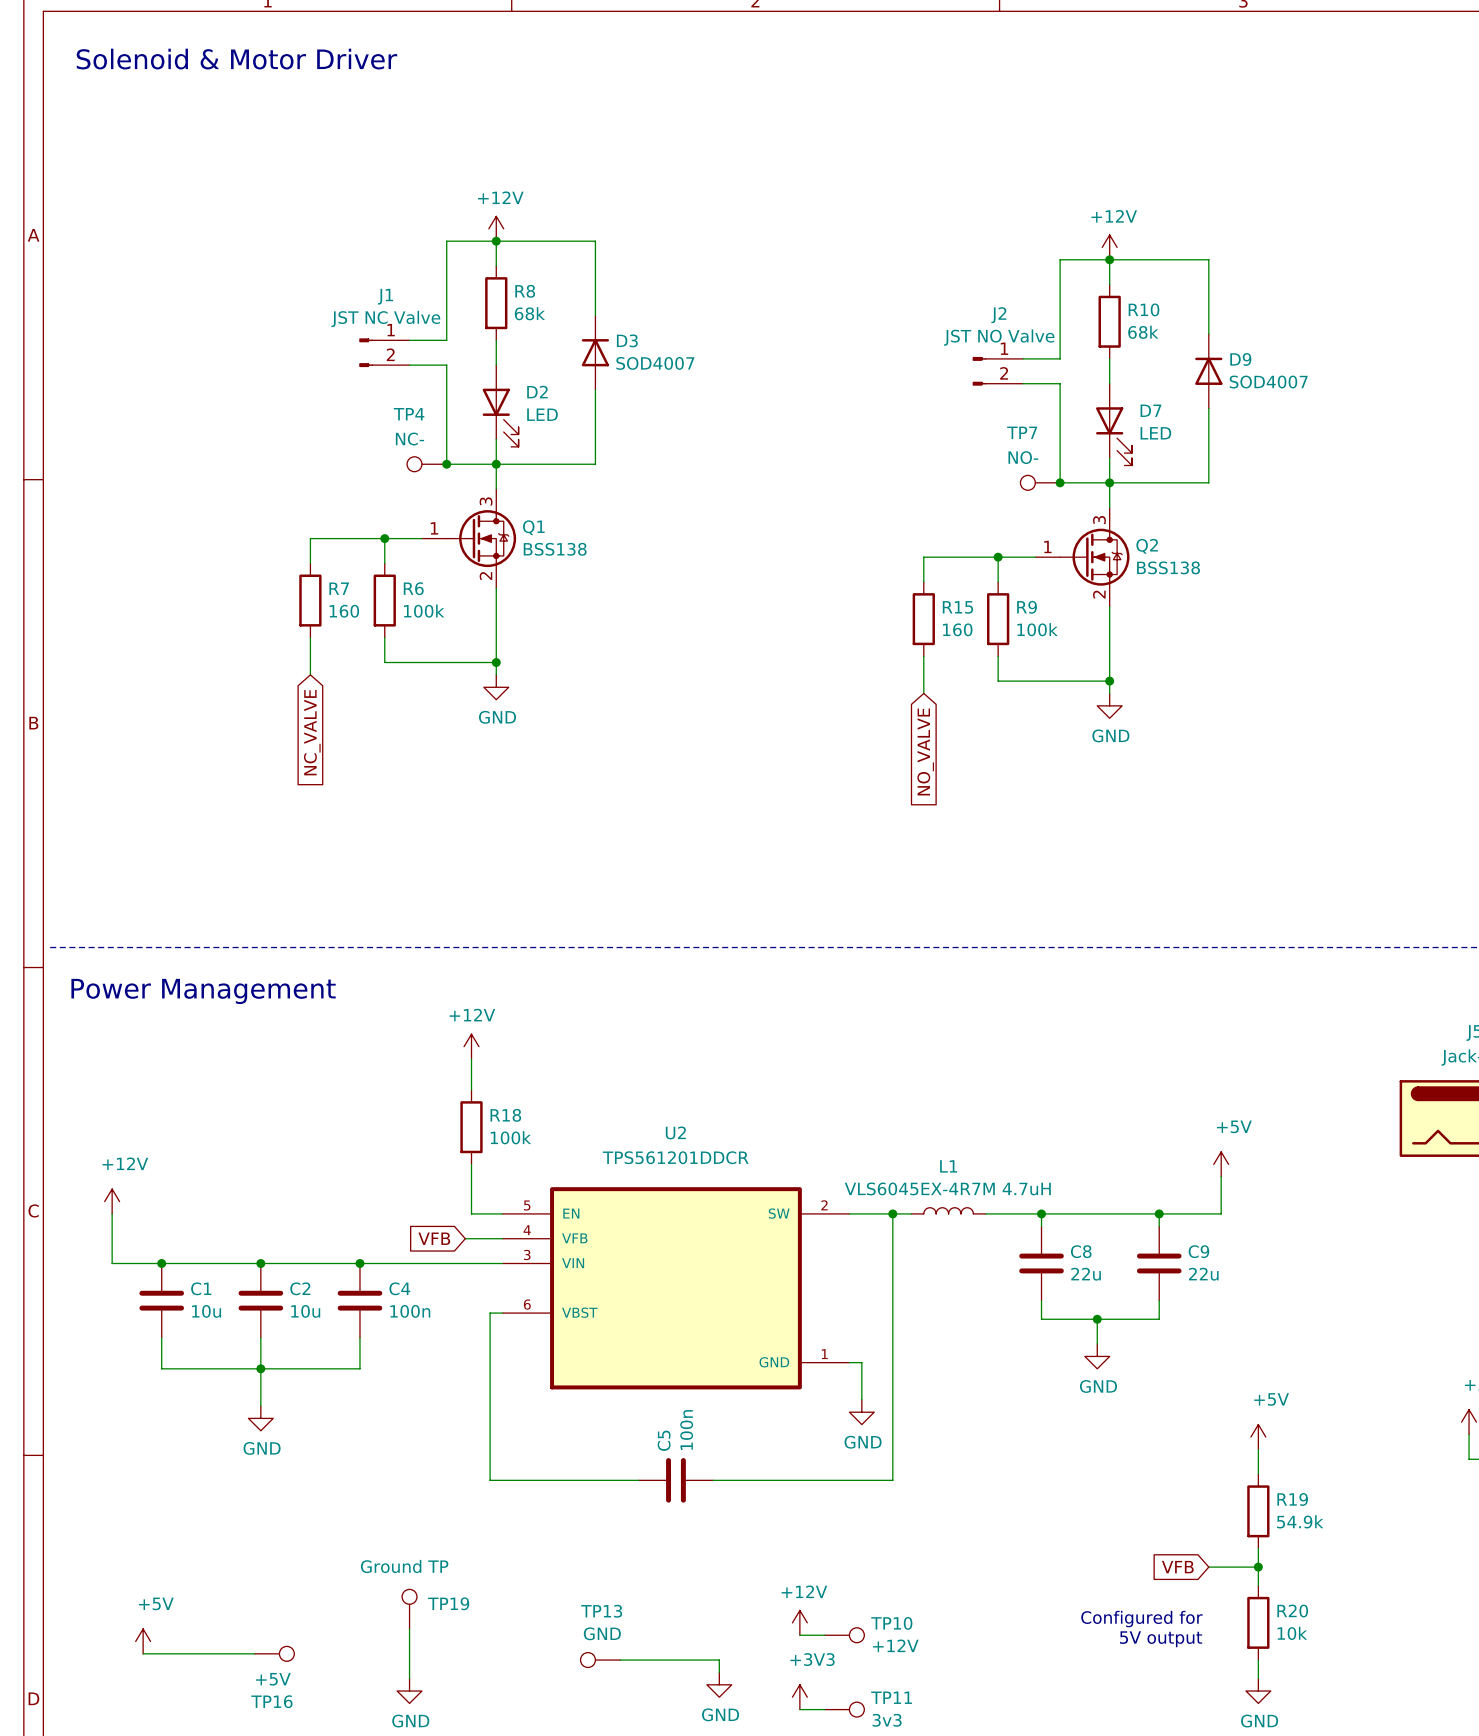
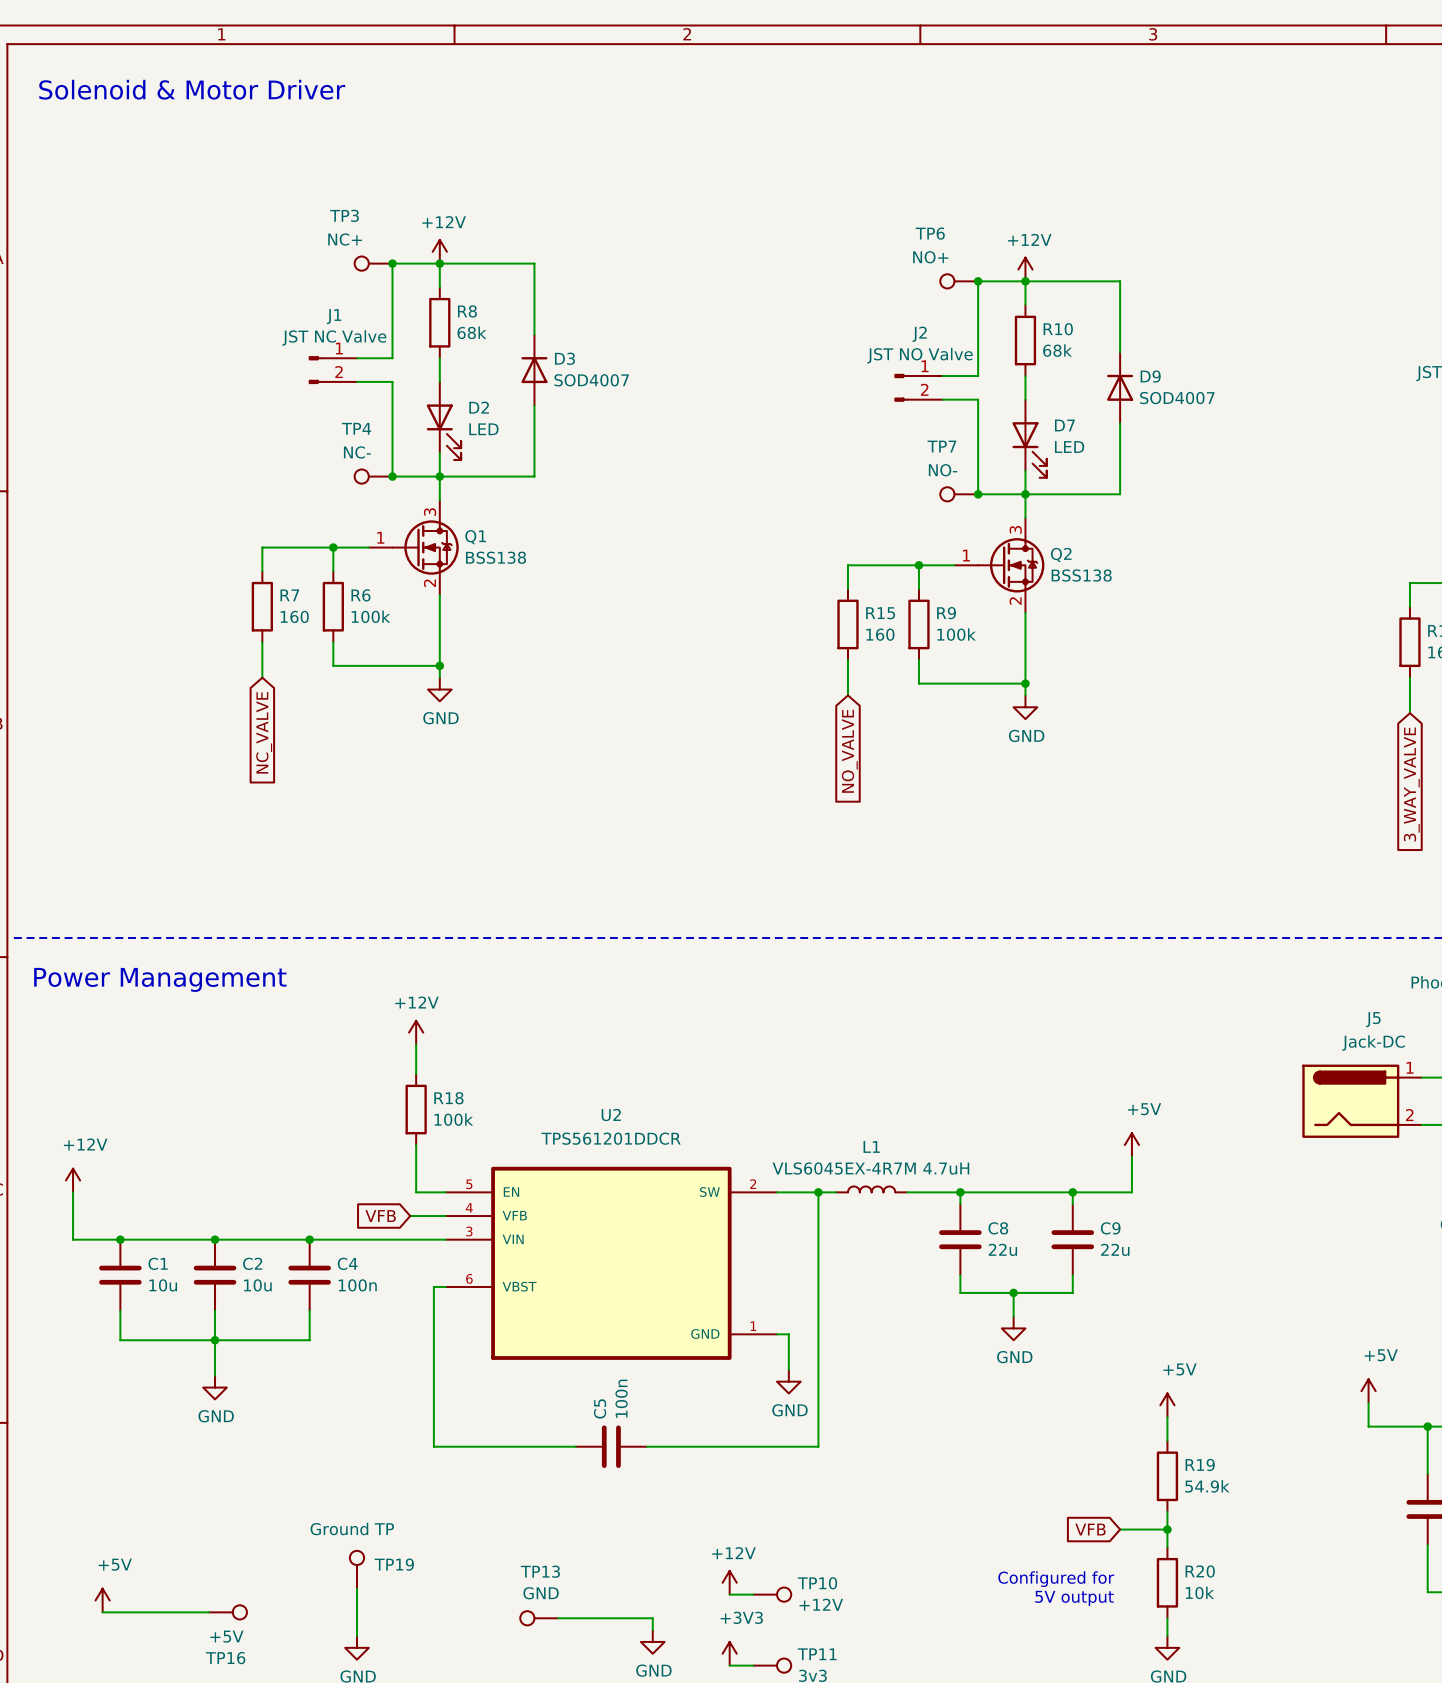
TP3: none -> NC+ (373, 263)
junction: none -> (392, 263)
TP6: none -> NO+ (959, 281)
junction: none -> (978, 281)

